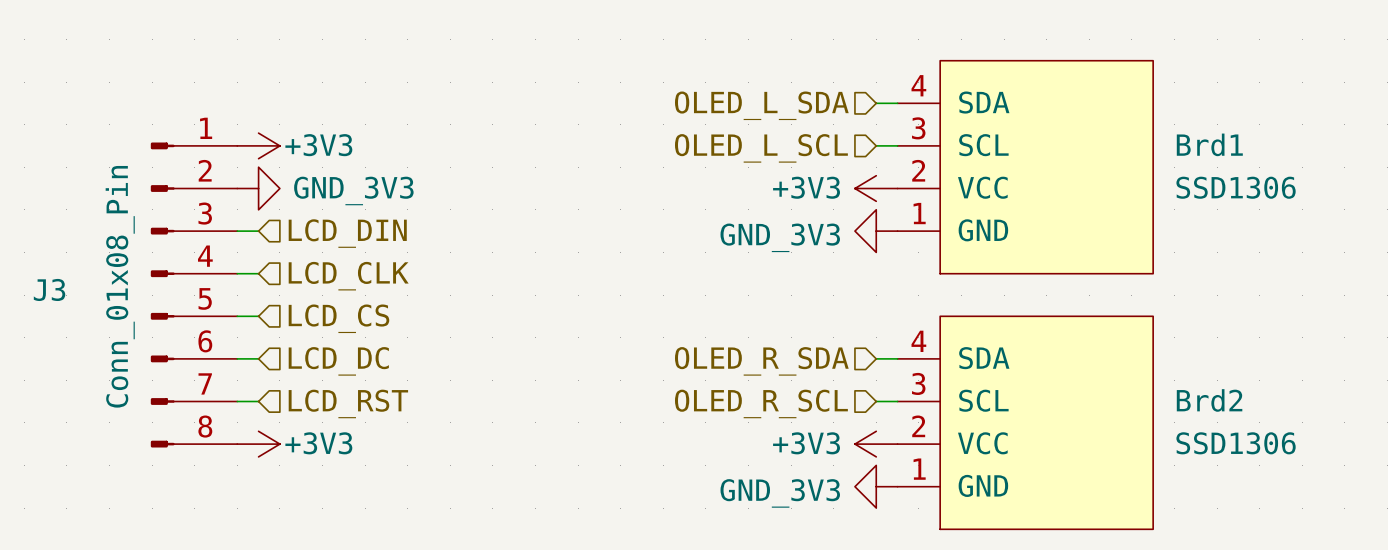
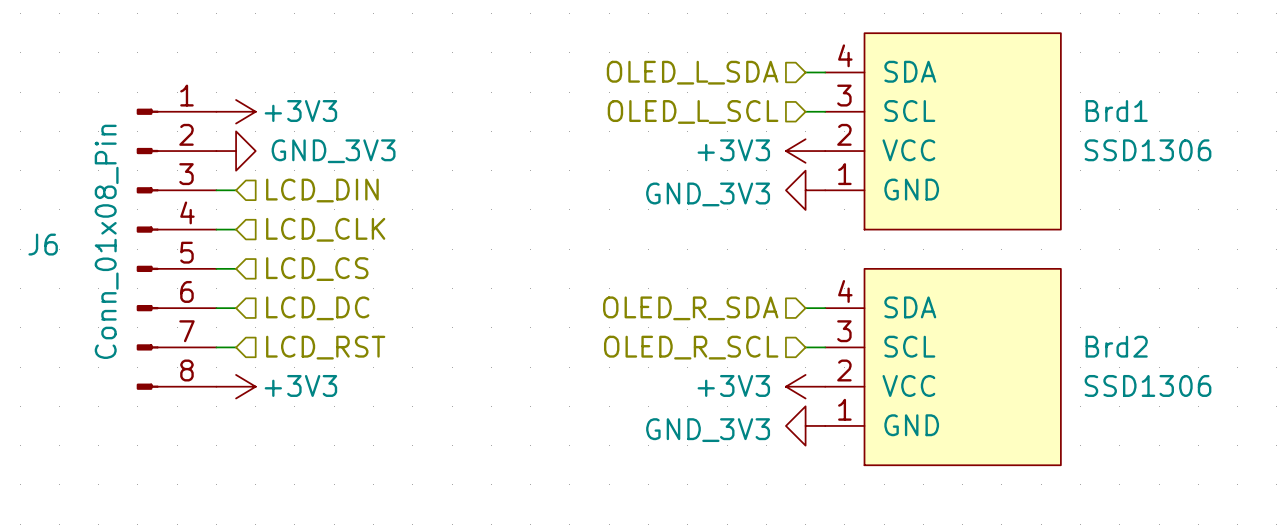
J3 name: J3 (49, 289) -> J6 (43, 244)

